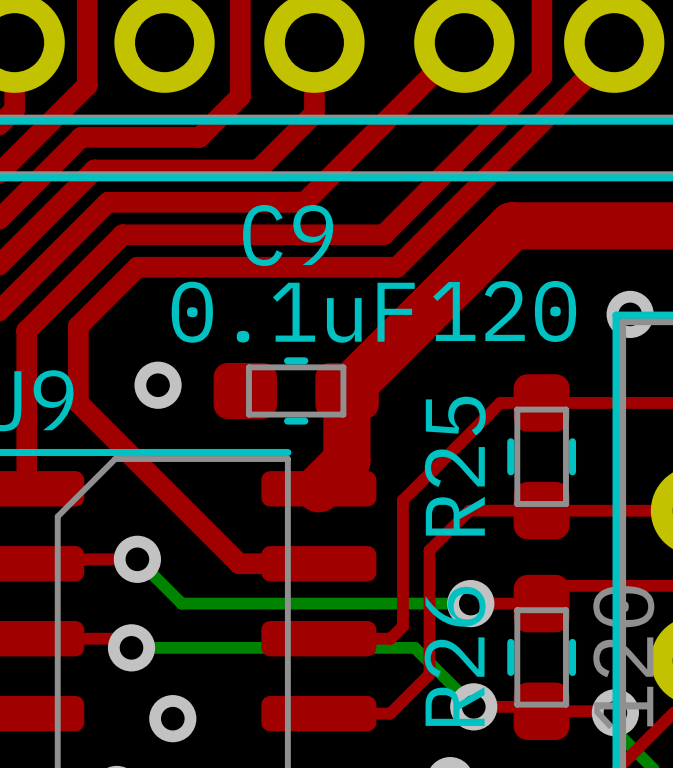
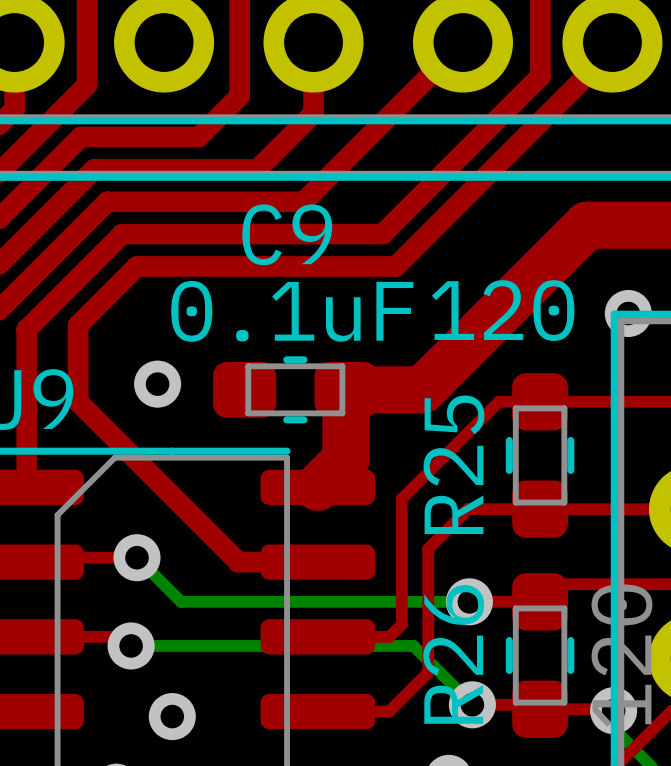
top track: (588, 225) (512, 225) (347, 390) -> (587, 225) (422, 389) (346, 389)

